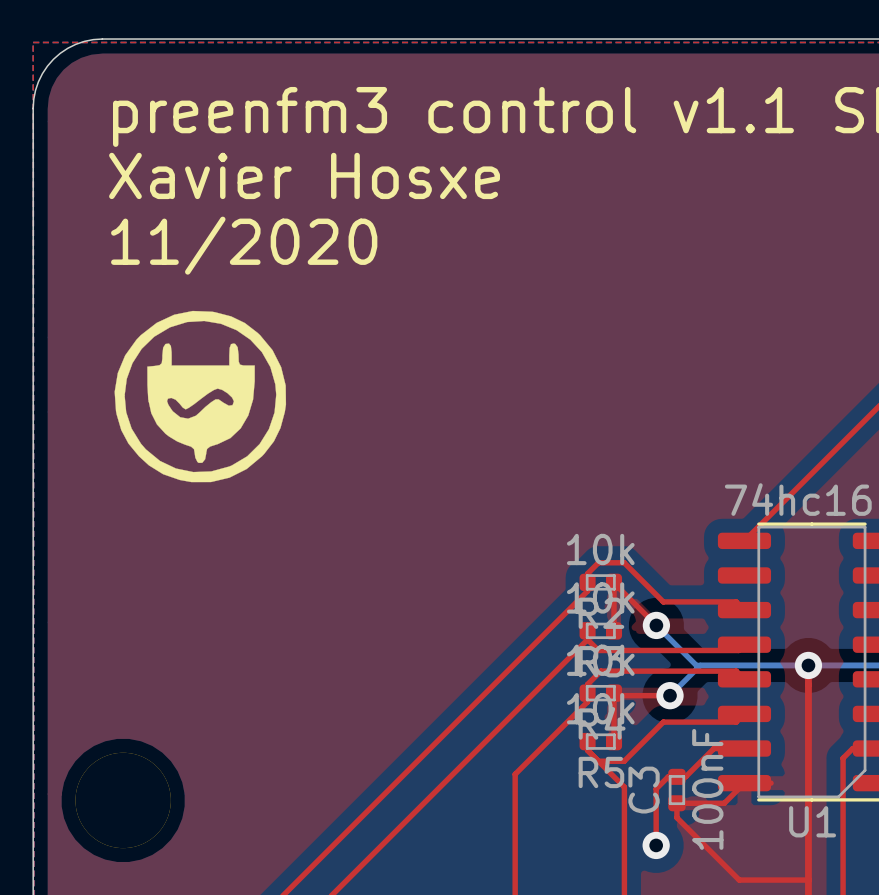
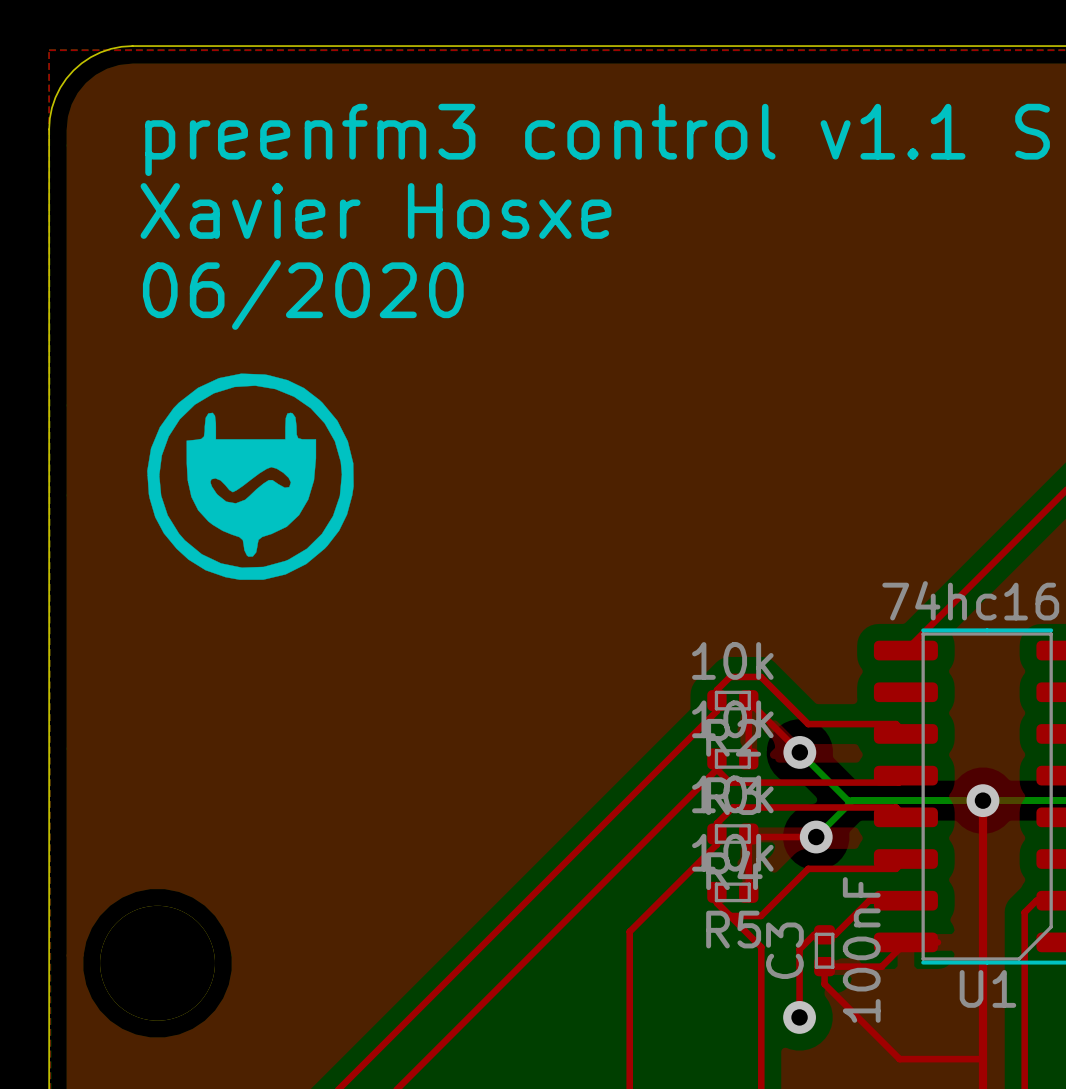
text: 11/2020 (244, 245) -> 06/2020 (303, 294)

